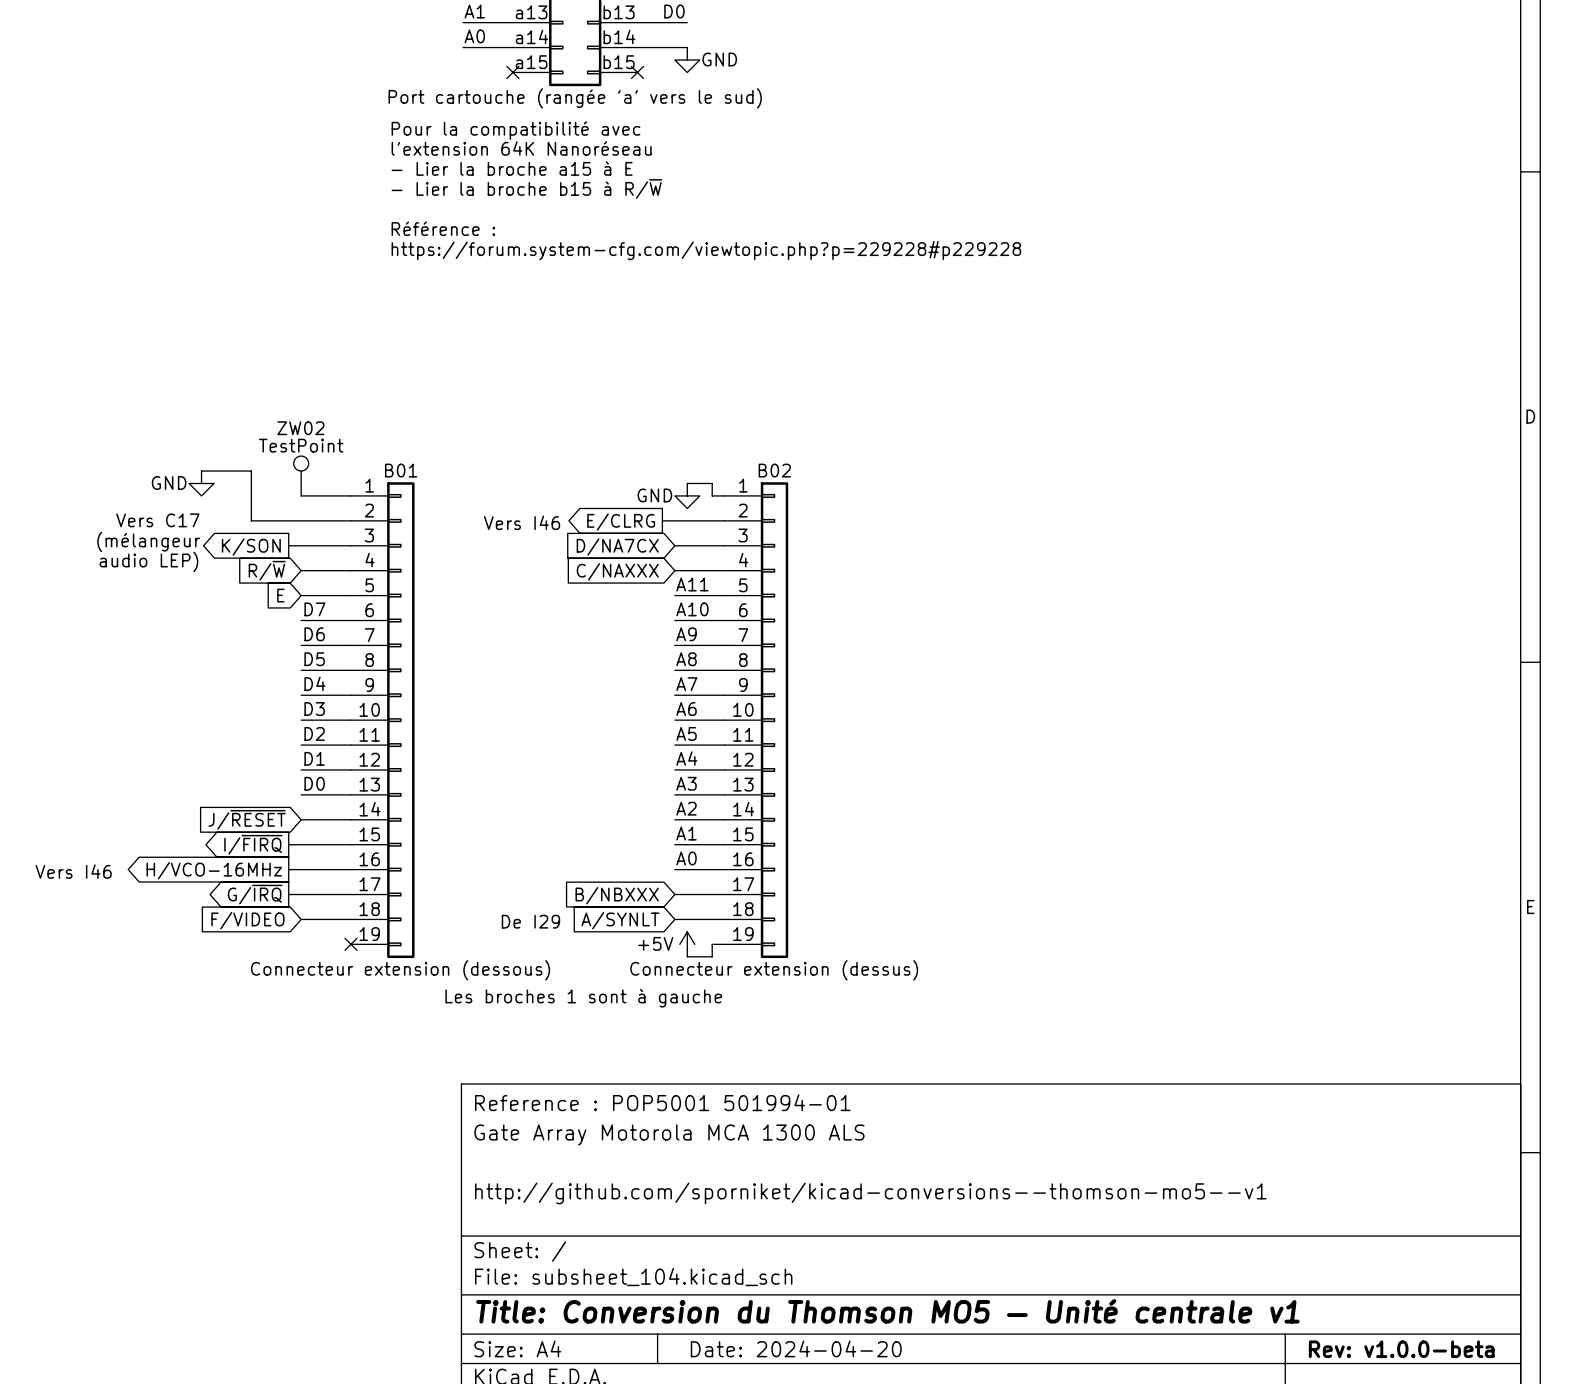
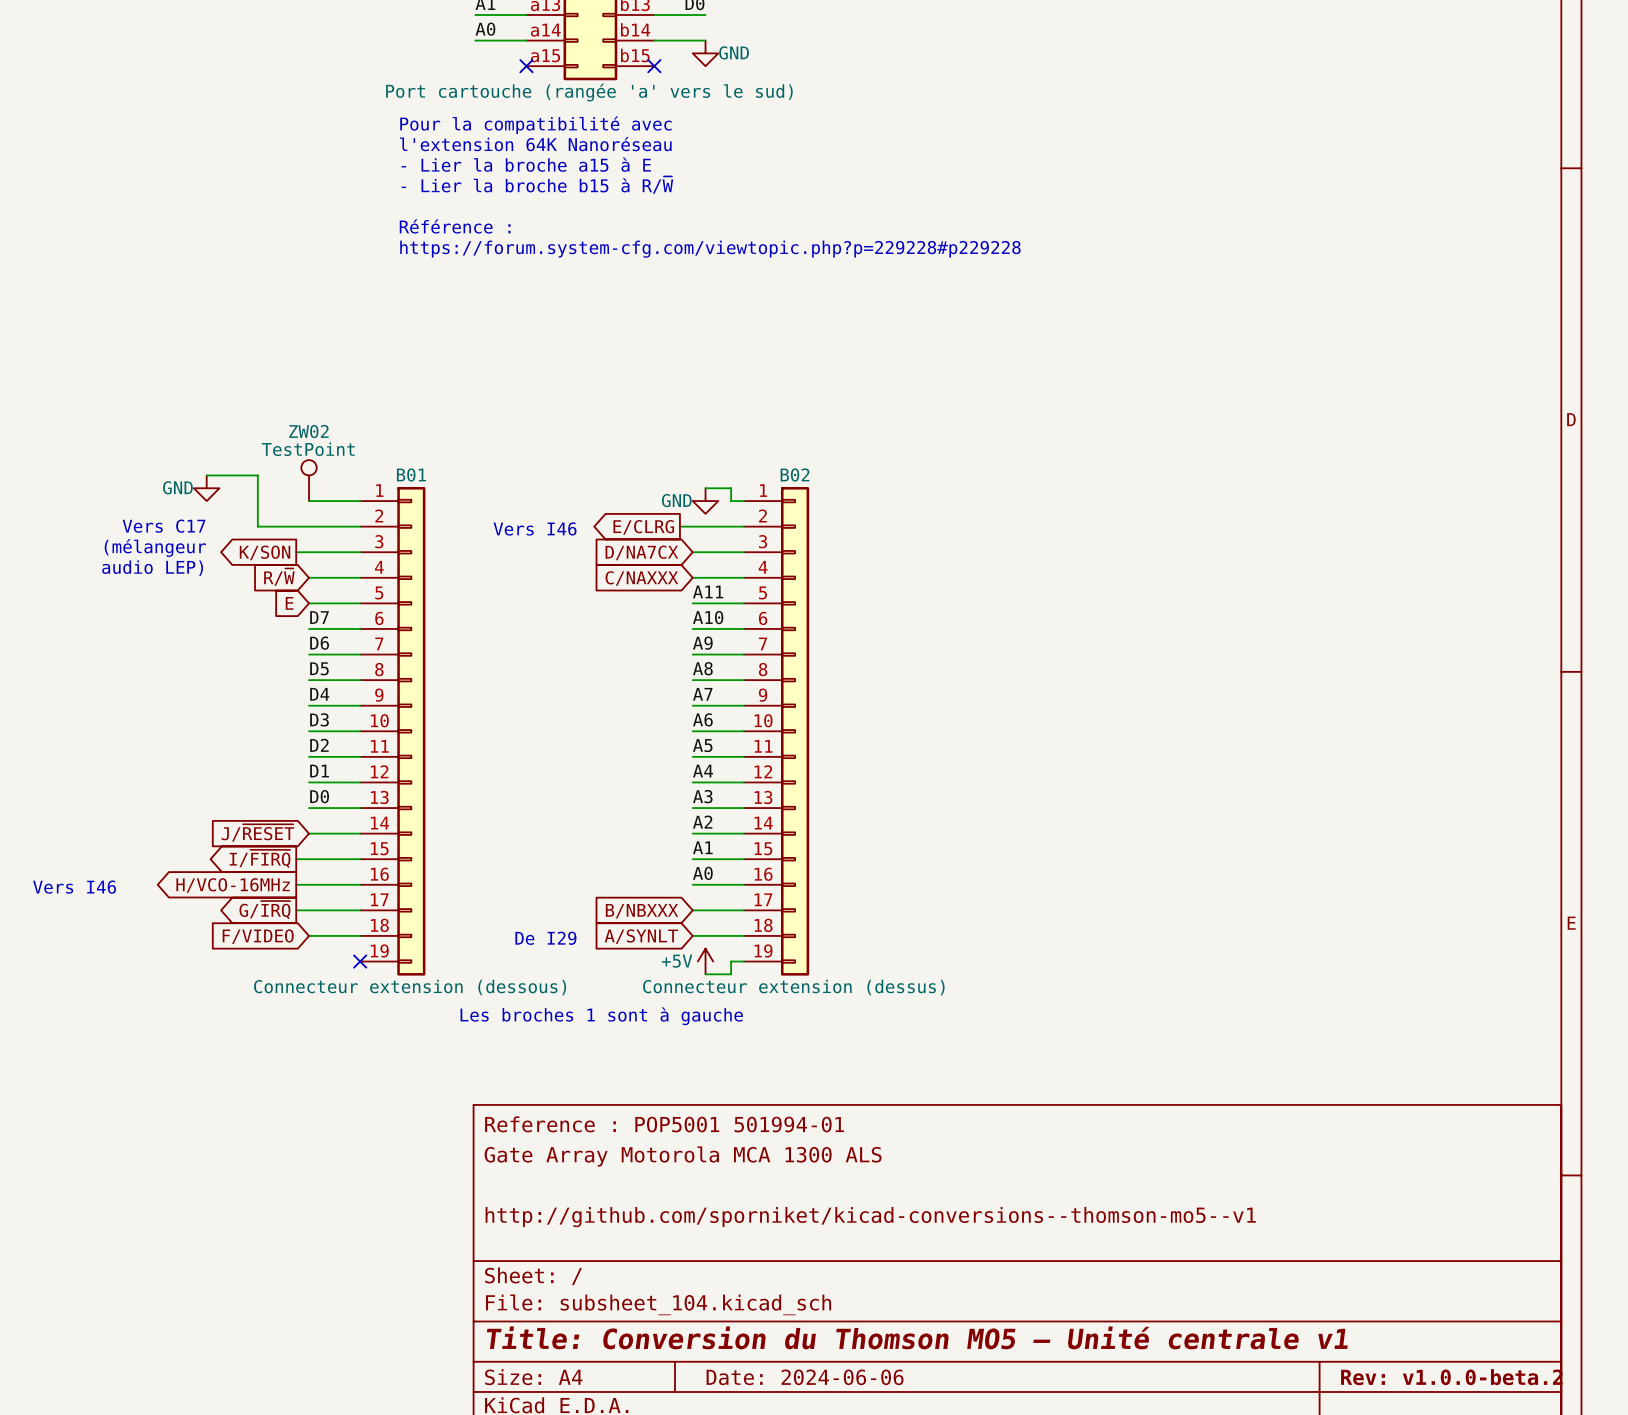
title block: Date: 2024-04-20 (796, 1348) -> Date: 2024-06-06 (805, 1377)
title block: Rev: v1.0.0-beta (1401, 1349) -> Rev: v1.0.0-beta.2 (1451, 1377)

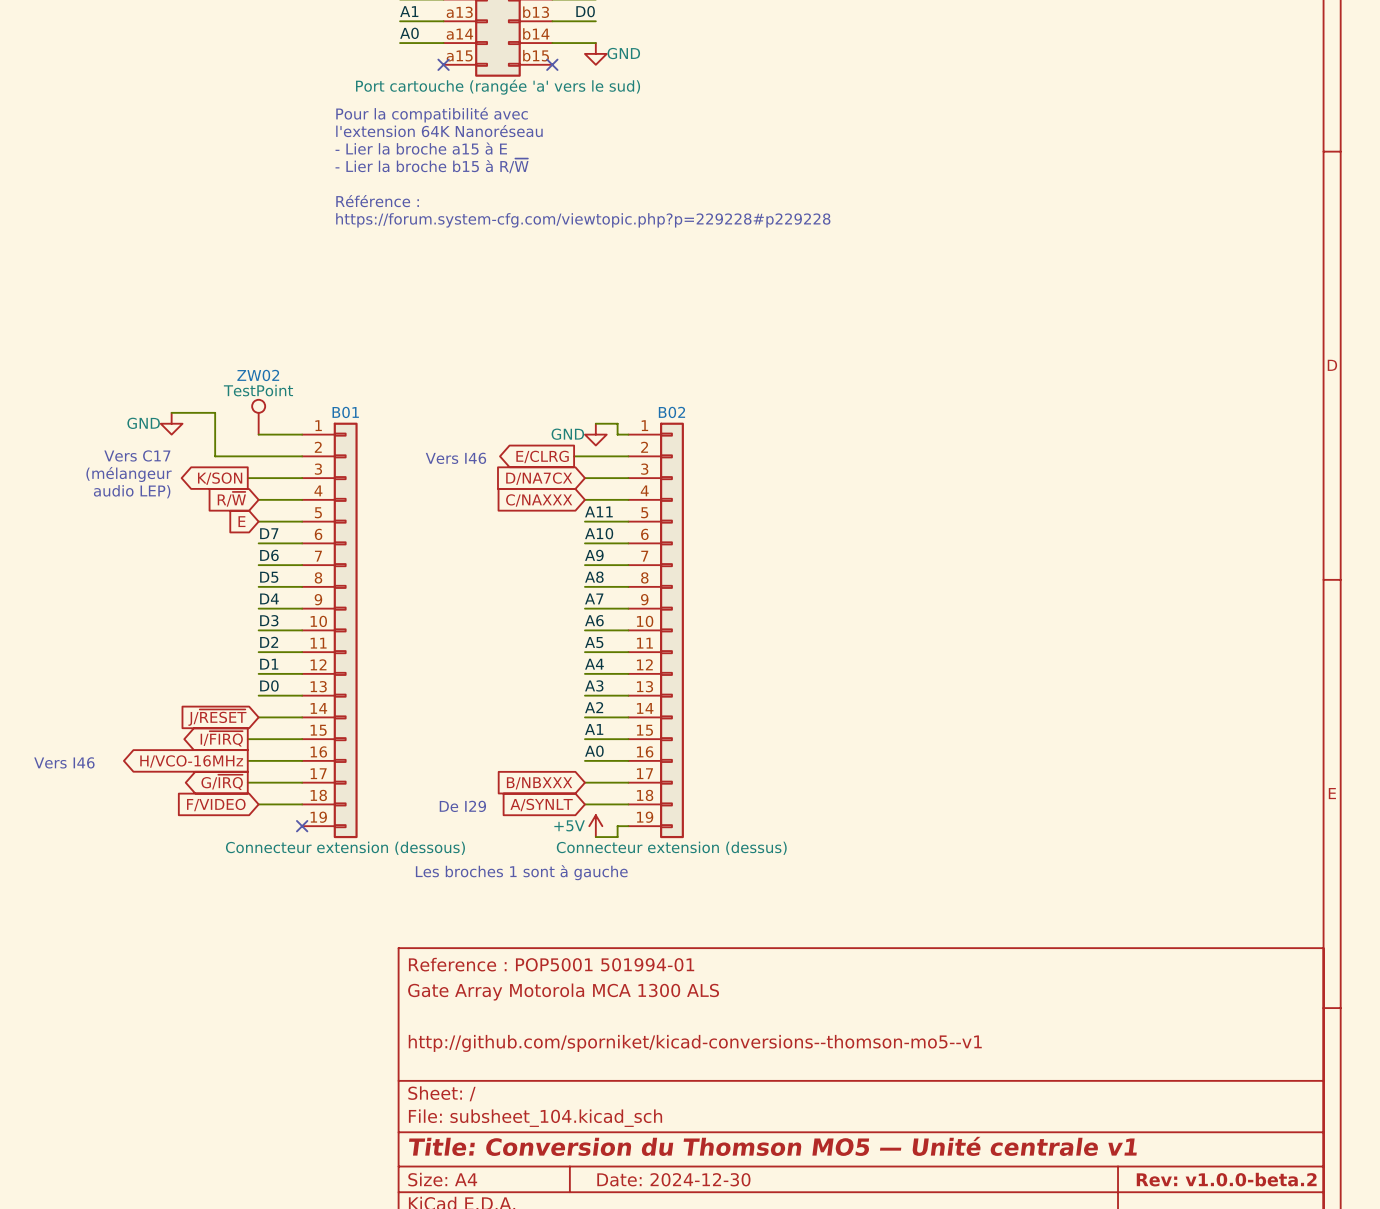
title block: Date: 2024-06-06 (805, 1377) -> Date: 2024-12-30 (673, 1179)

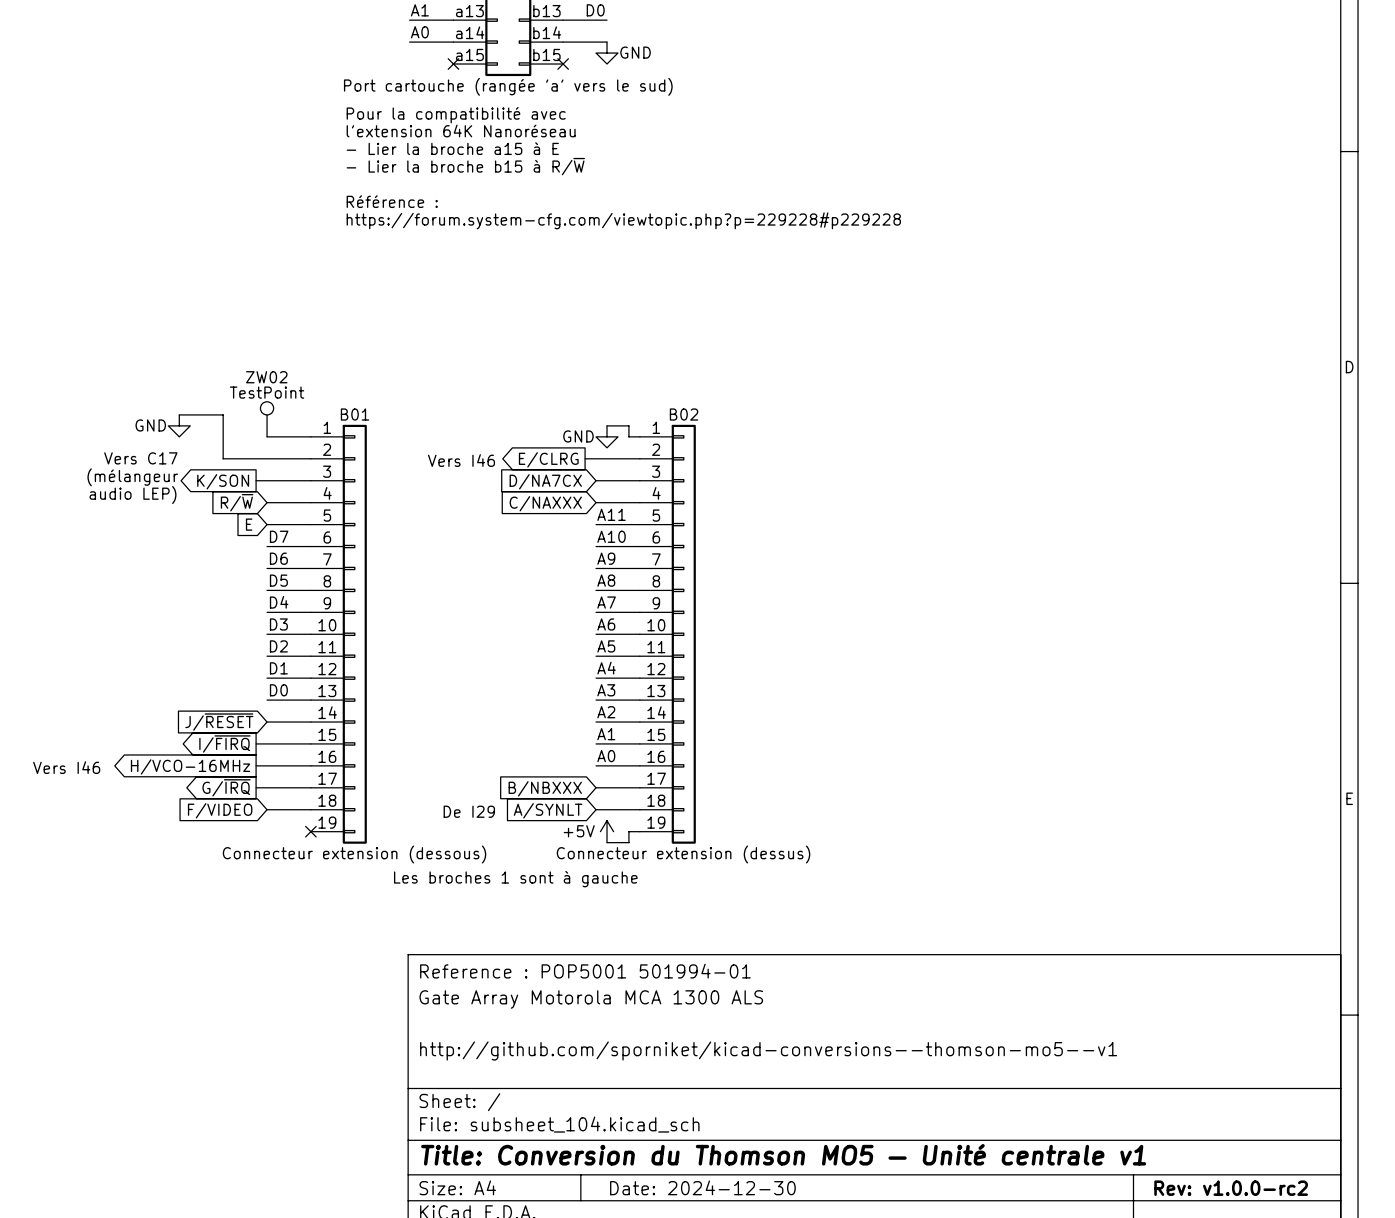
title block: Rev: v1.0.0-beta.2 (1226, 1179) -> Rev: v1.0.0-rc2 (1231, 1188)

